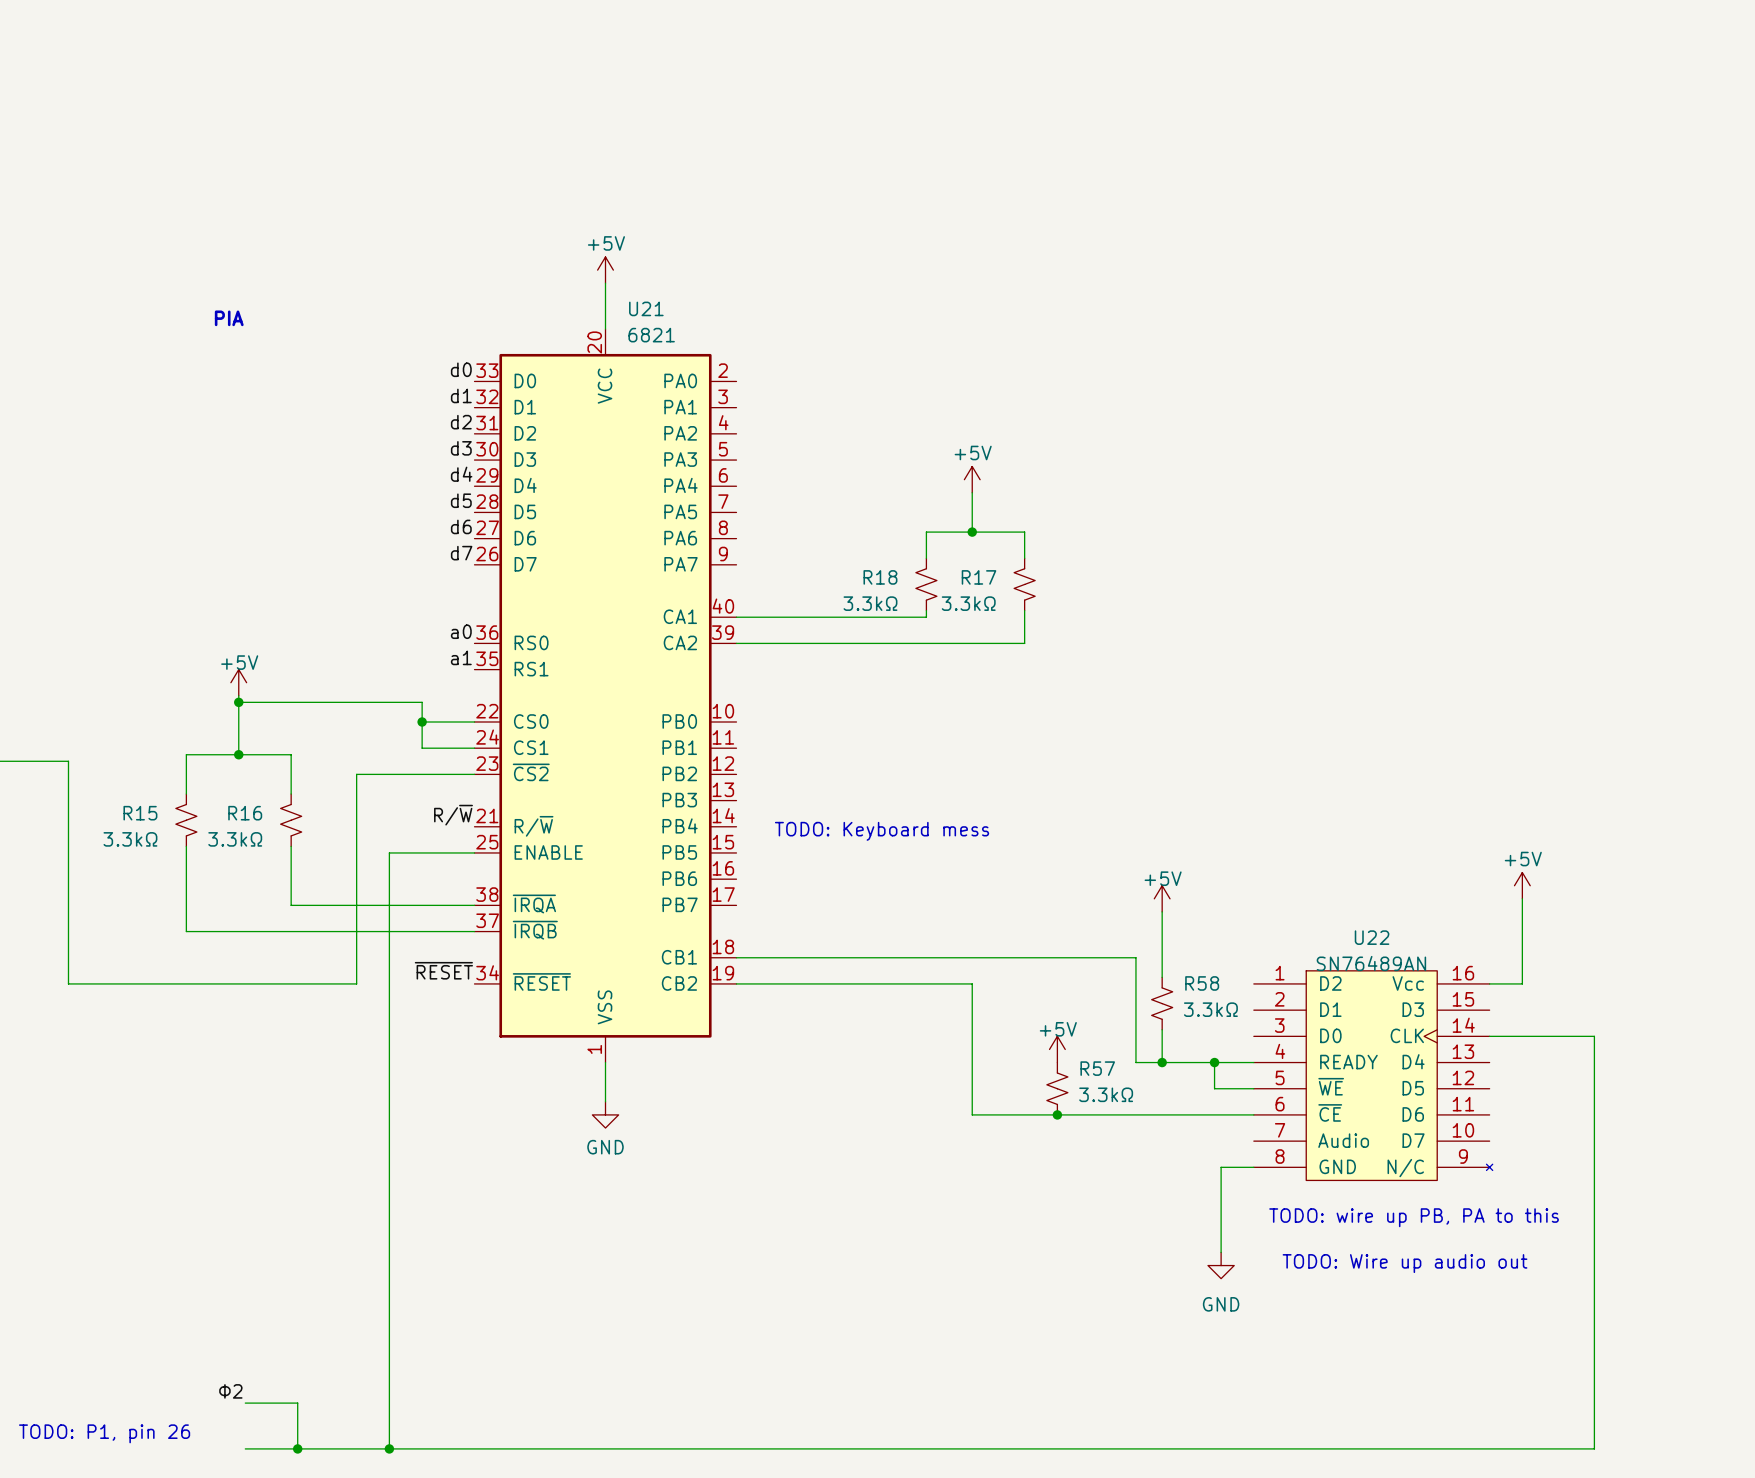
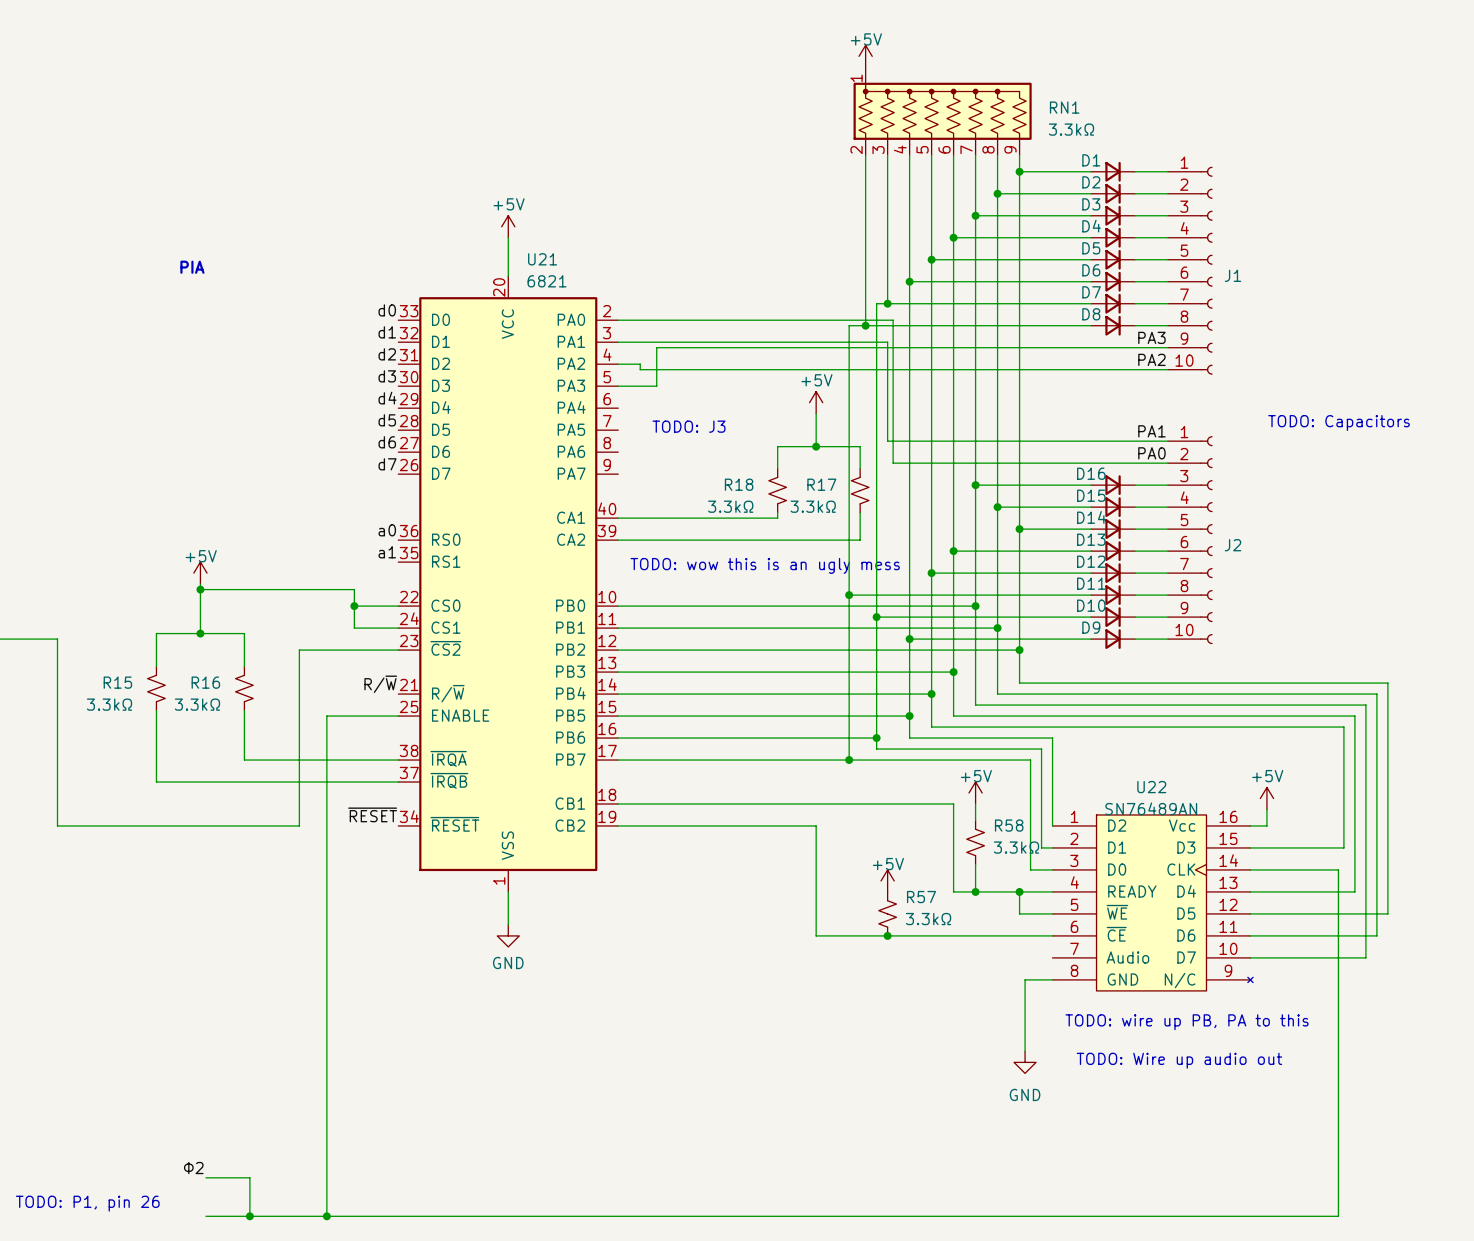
power symbol: none -> +5V (865, 56)
RN1: none -> 3.3kΩ (942, 111)
wire: none -> (865, 155) (865, 325)
wire: none -> (887, 155) (887, 303)
wire: none -> (909, 155) (909, 738) (1052, 738) (1052, 825)
wire: none -> (931, 155) (931, 727) (1343, 727) (1343, 847) (1250, 847)
wire: none -> (953, 155) (953, 716) (1354, 716) (1354, 891) (1250, 891)
wire: none -> (975, 155) (975, 705) (1365, 705) (1365, 957) (1250, 957)
wire: none -> (997, 155) (997, 694) (1376, 694) (1376, 935) (1250, 935)
wire: none -> (1019, 155) (1019, 683) (1387, 683) (1387, 913) (1250, 913)
wire: none -> (1019, 171) (1091, 171)
junction: none -> (1019, 171)
D1: none -> (1113, 171)
wire: none -> (1135, 171) (1168, 171)
wire: none -> (997, 193) (1091, 193)
junction: none -> (997, 193)
D2: none -> (1113, 193)
wire: none -> (1135, 193) (1168, 193)
wire: none -> (975, 215) (1091, 215)
junction: none -> (975, 215)
D3: none -> (1113, 215)
wire: none -> (1135, 215) (1168, 215)
wire: none -> (953, 237) (1091, 237)
junction: none -> (953, 237)
D4: none -> (1113, 237)
wire: none -> (1135, 237) (1168, 237)
wire: none -> (931, 259) (1091, 259)
junction: none -> (931, 259)
D5: none -> (1113, 259)
wire: none -> (1135, 259) (1168, 259)
J1: none -> (1190, 270)
wire: none -> (909, 281) (1091, 281)
junction: none -> (909, 281)
D6: none -> (1113, 281)
wire: none -> (1135, 281) (1168, 281)
junction: none -> (887, 303)
wire: none -> (1091, 303) (876, 303) (876, 749) (1041, 749) (1041, 847) (1052, 847)
D7: none -> (1113, 303)
wire: none -> (1135, 303) (1168, 303)
wire: none -> (618, 320) (893, 320) (893, 463) (1168, 463)
junction: none -> (865, 325)
wire: none -> (1091, 325) (849, 325) (849, 760)
D8: none -> (1113, 325)
wire: none -> (1135, 325) (1168, 325)
label: none -> PA3 (1151, 337)
wire: none -> (618, 342) (887, 342) (887, 441) (1168, 441)
wire: none -> (1168, 347) (656, 347) (656, 386) (618, 386)
label: none -> PA2 (1151, 359)
wire: none -> (618, 364) (640, 364) (640, 369) (1168, 369)
text: none -> TODO: Capacitors (1339, 422)
text: none -> TODO: J3 (689, 426)
label: none -> PA1 (1151, 431)
label: none -> PA0 (1151, 453)
wire: none -> (975, 485) (1091, 485)
junction: none -> (975, 485)
D16: none -> (1113, 485)
wire: none -> (1135, 485) (1168, 485)
wire: none -> (997, 507) (1091, 507)
junction: none -> (997, 507)
D15: none -> (1113, 507)
wire: none -> (1135, 507) (1168, 507)
wire: none -> (1019, 529) (1091, 529)
junction: none -> (1019, 529)
D14: none -> (1113, 529)
wire: none -> (1135, 529) (1168, 529)
J2: none -> (1190, 540)
wire: none -> (953, 551) (1091, 551)
junction: none -> (953, 551)
D13: none -> (1113, 551)
wire: none -> (1135, 551) (1168, 551)
text: none -> TODO: wow this is an ugly mess (765, 565)
wire: none -> (931, 573) (1091, 573)
junction: none -> (931, 573)
D12: none -> (1113, 573)
wire: none -> (1135, 573) (1168, 573)
wire: none -> (849, 595) (1091, 595)
junction: none -> (849, 595)
D11: none -> (1113, 595)
wire: none -> (1135, 595) (1168, 595)
wire: none -> (618, 606) (975, 606)
junction: none -> (975, 606)
wire: none -> (876, 617) (1091, 617)
junction: none -> (876, 617)
D10: none -> (1113, 617)
wire: none -> (1135, 617) (1168, 617)
wire: none -> (618, 628) (997, 628)
junction: none -> (997, 628)
wire: none -> (909, 639) (1091, 639)
junction: none -> (909, 639)
D9: none -> (1113, 639)
wire: none -> (1135, 639) (1168, 639)
wire: none -> (618, 650) (1019, 650)
junction: none -> (1019, 650)
wire: none -> (618, 672) (953, 672)
junction: none -> (953, 672)
wire: none -> (618, 694) (931, 694)
junction: none -> (931, 694)
text: TODO: Keyboard mess (882, 831) -> none
wire: none -> (618, 716) (909, 716)
junction: none -> (909, 716)
wire: none -> (618, 738) (876, 738)
junction: none -> (876, 738)
power symbol position: +5V (1522, 885) -> +5V (1266, 798)
power symbol position: +5V (1162, 898) -> +5V (975, 793)
wire: (1522, 898) (1522, 983) (1509, 983) -> (1266, 809) (1266, 825)
wire: none -> (618, 760) (1030, 760) (1030, 869) (1052, 869)
junction: none -> (849, 760)

